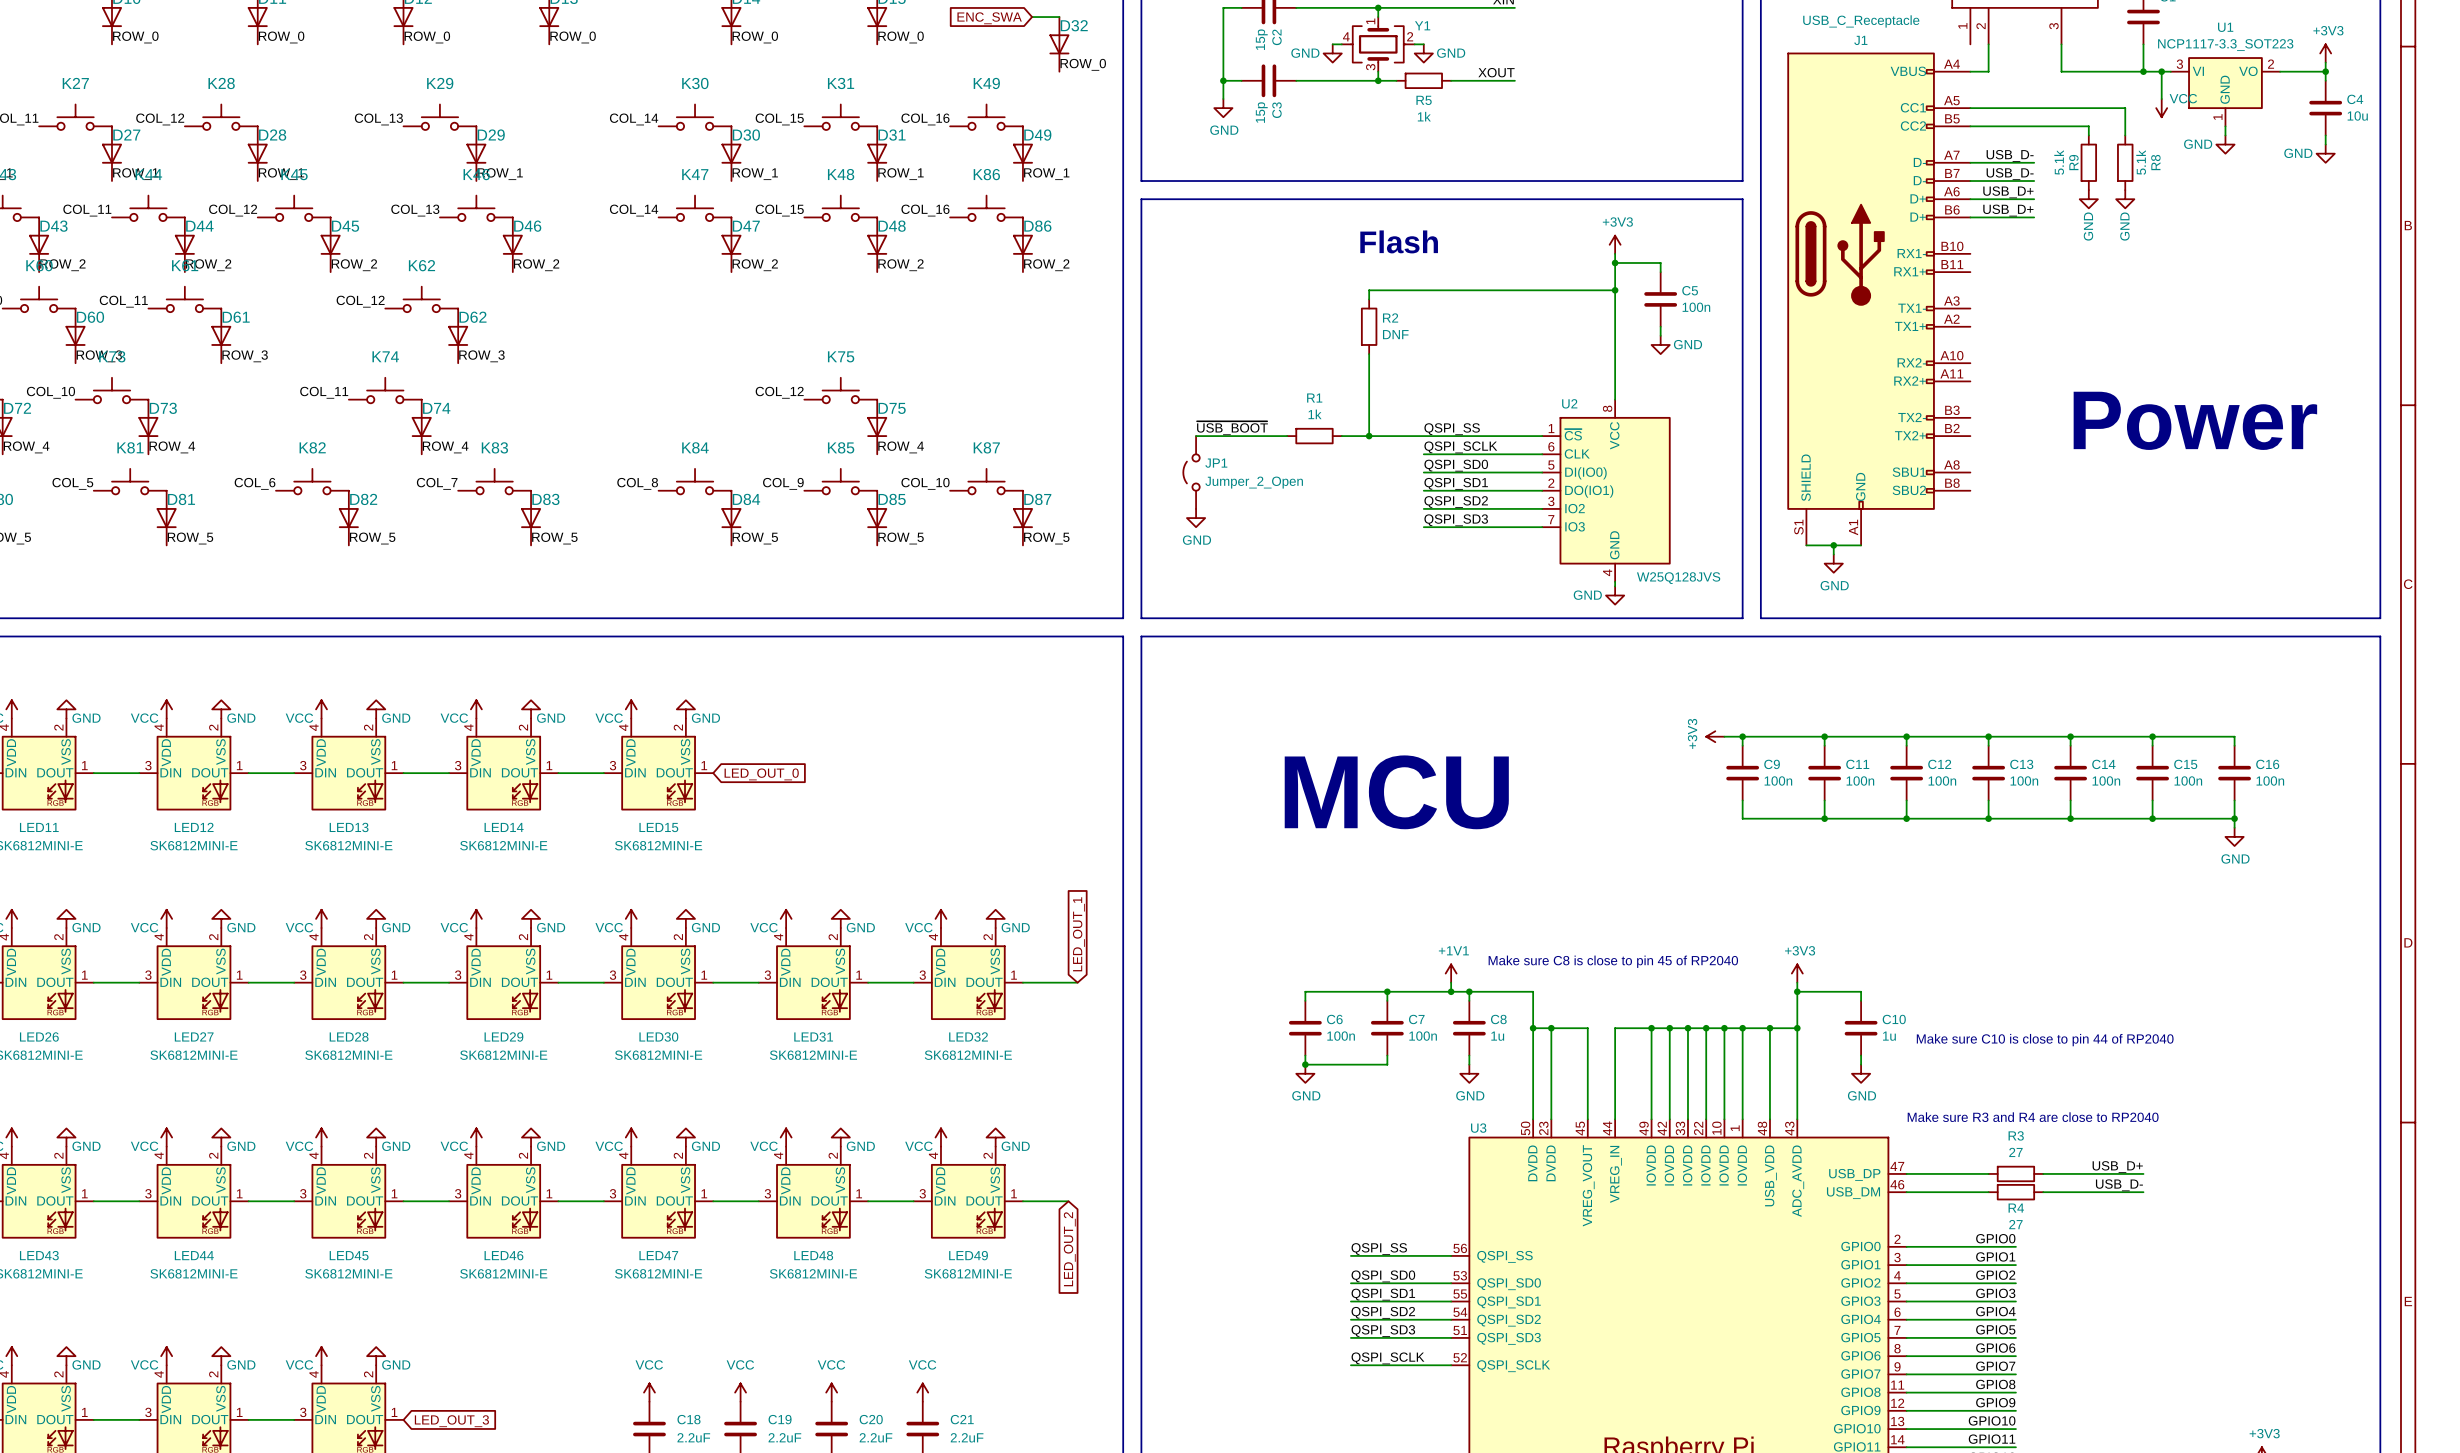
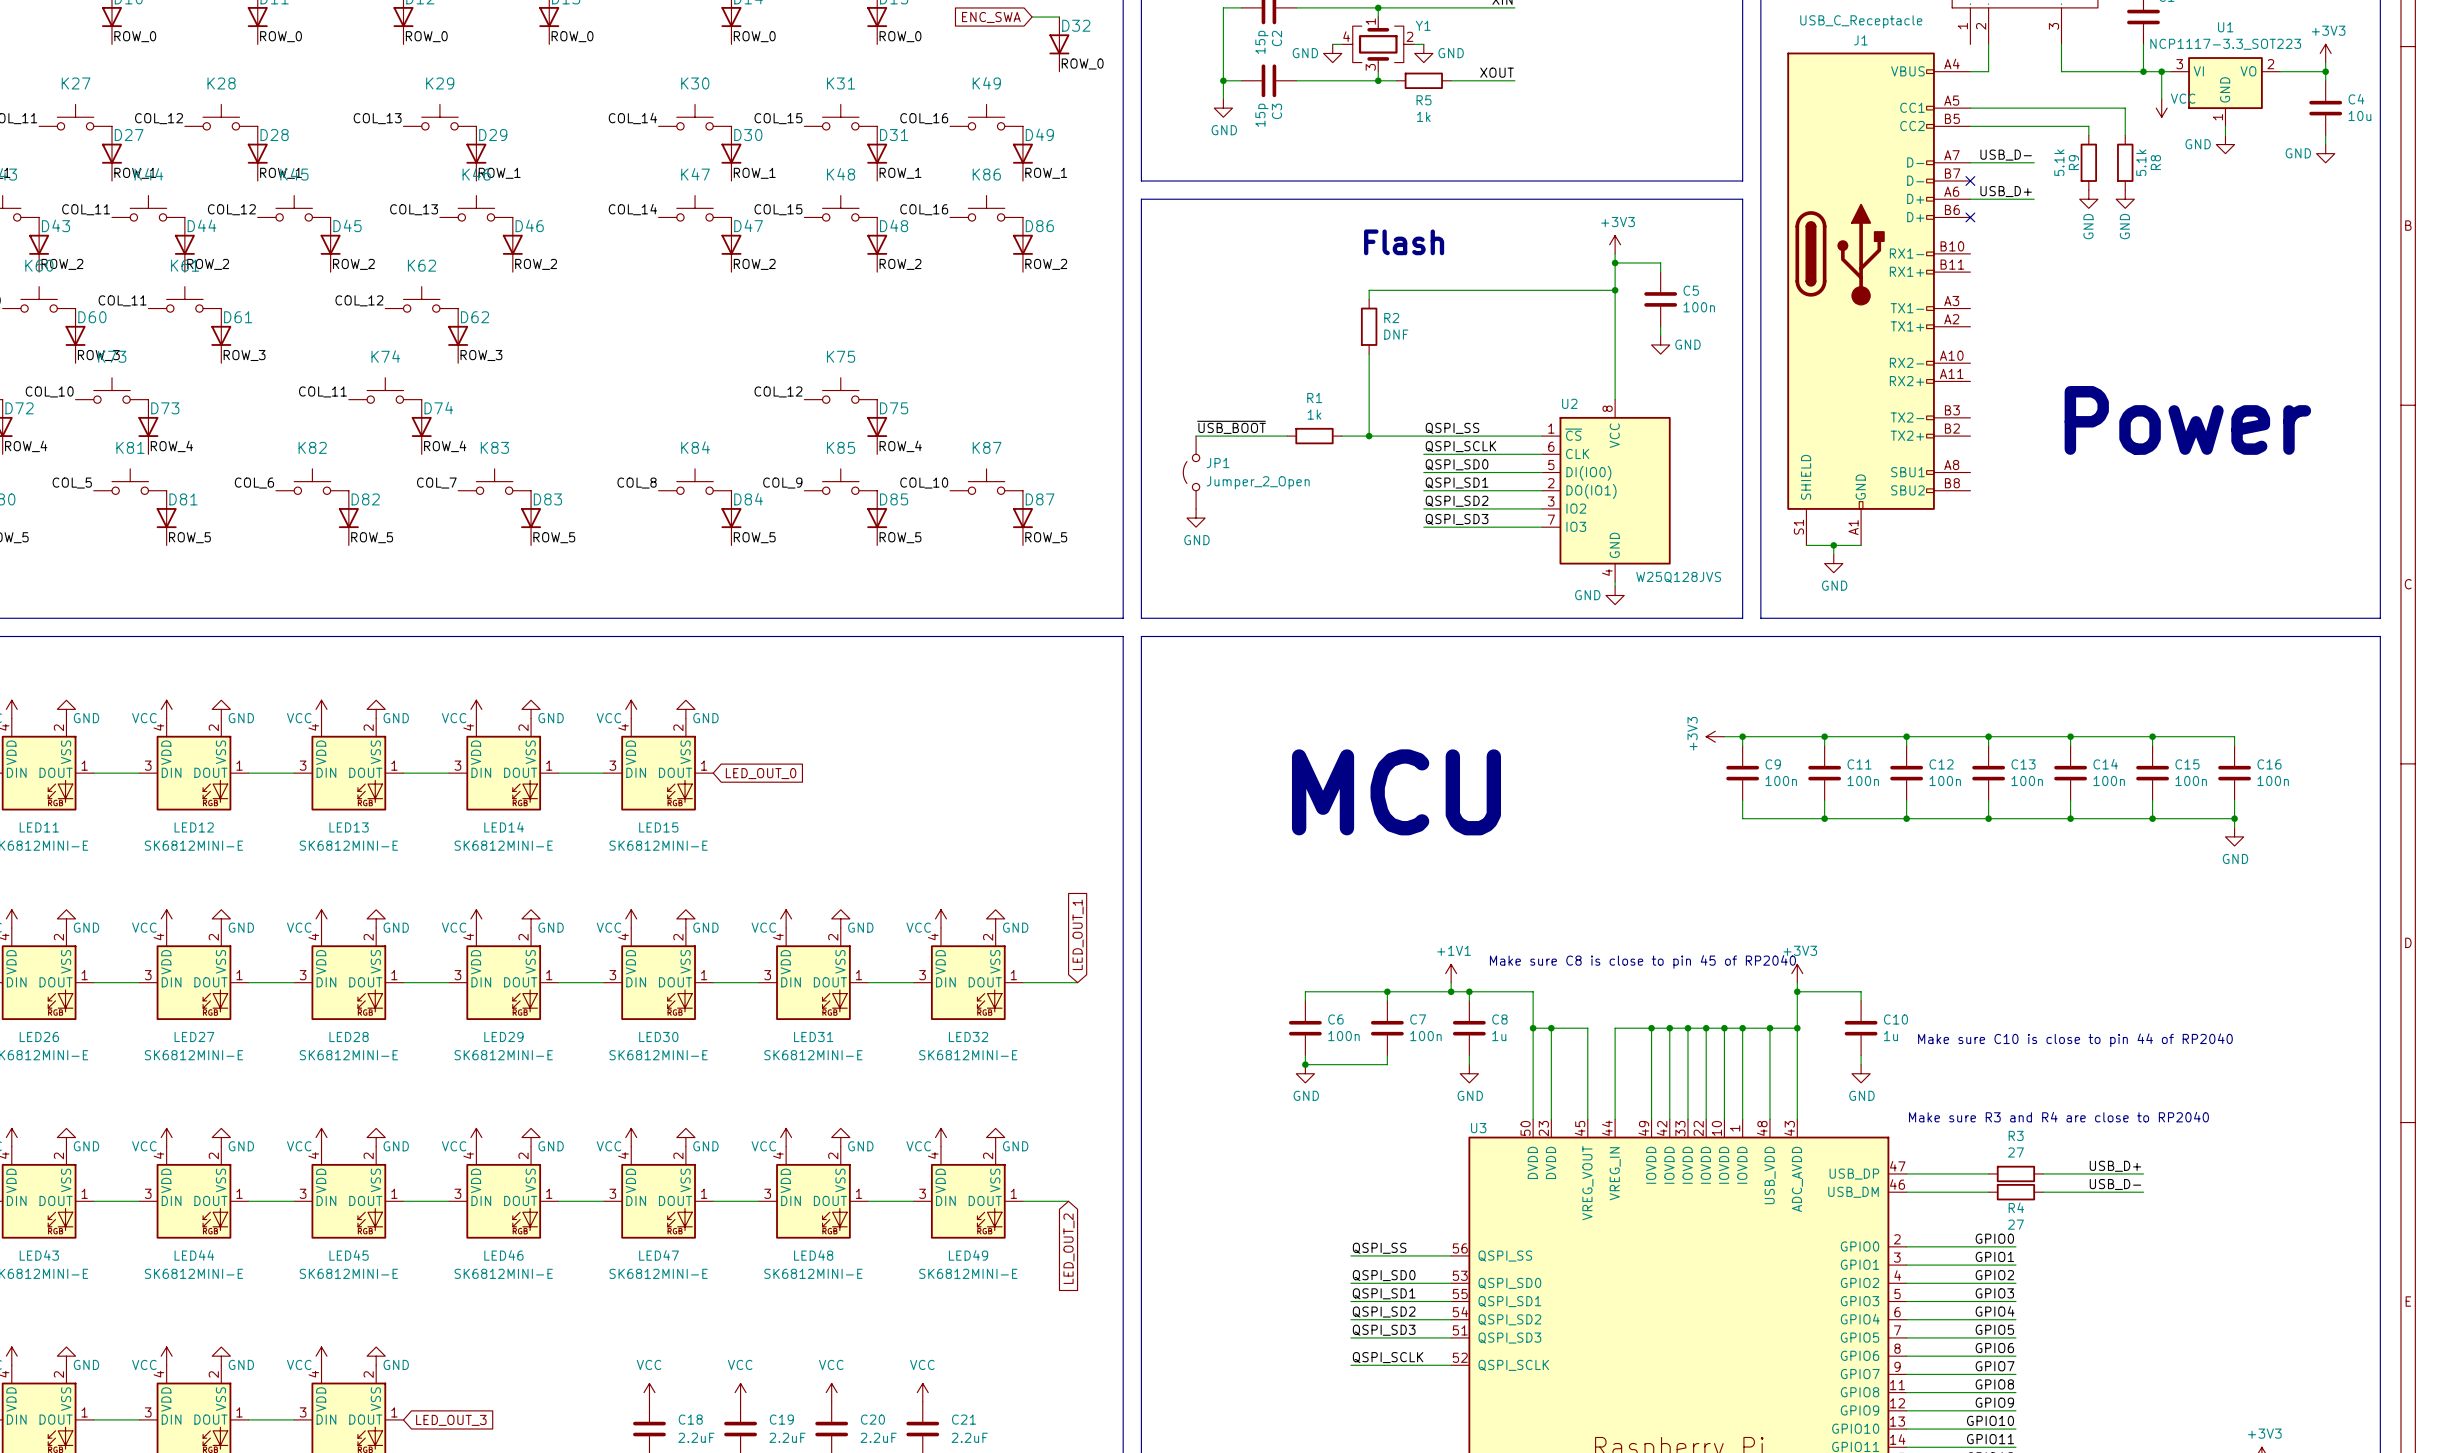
label: USB_D- (2010, 174) -> none
wire: (1970, 181) (2034, 181) -> none
no-connect mark: none -> (1970, 181)
label: USB_D+ (2008, 210) -> none
wire: (1970, 217) (2034, 217) -> none
no-connect mark: none -> (1970, 217)

